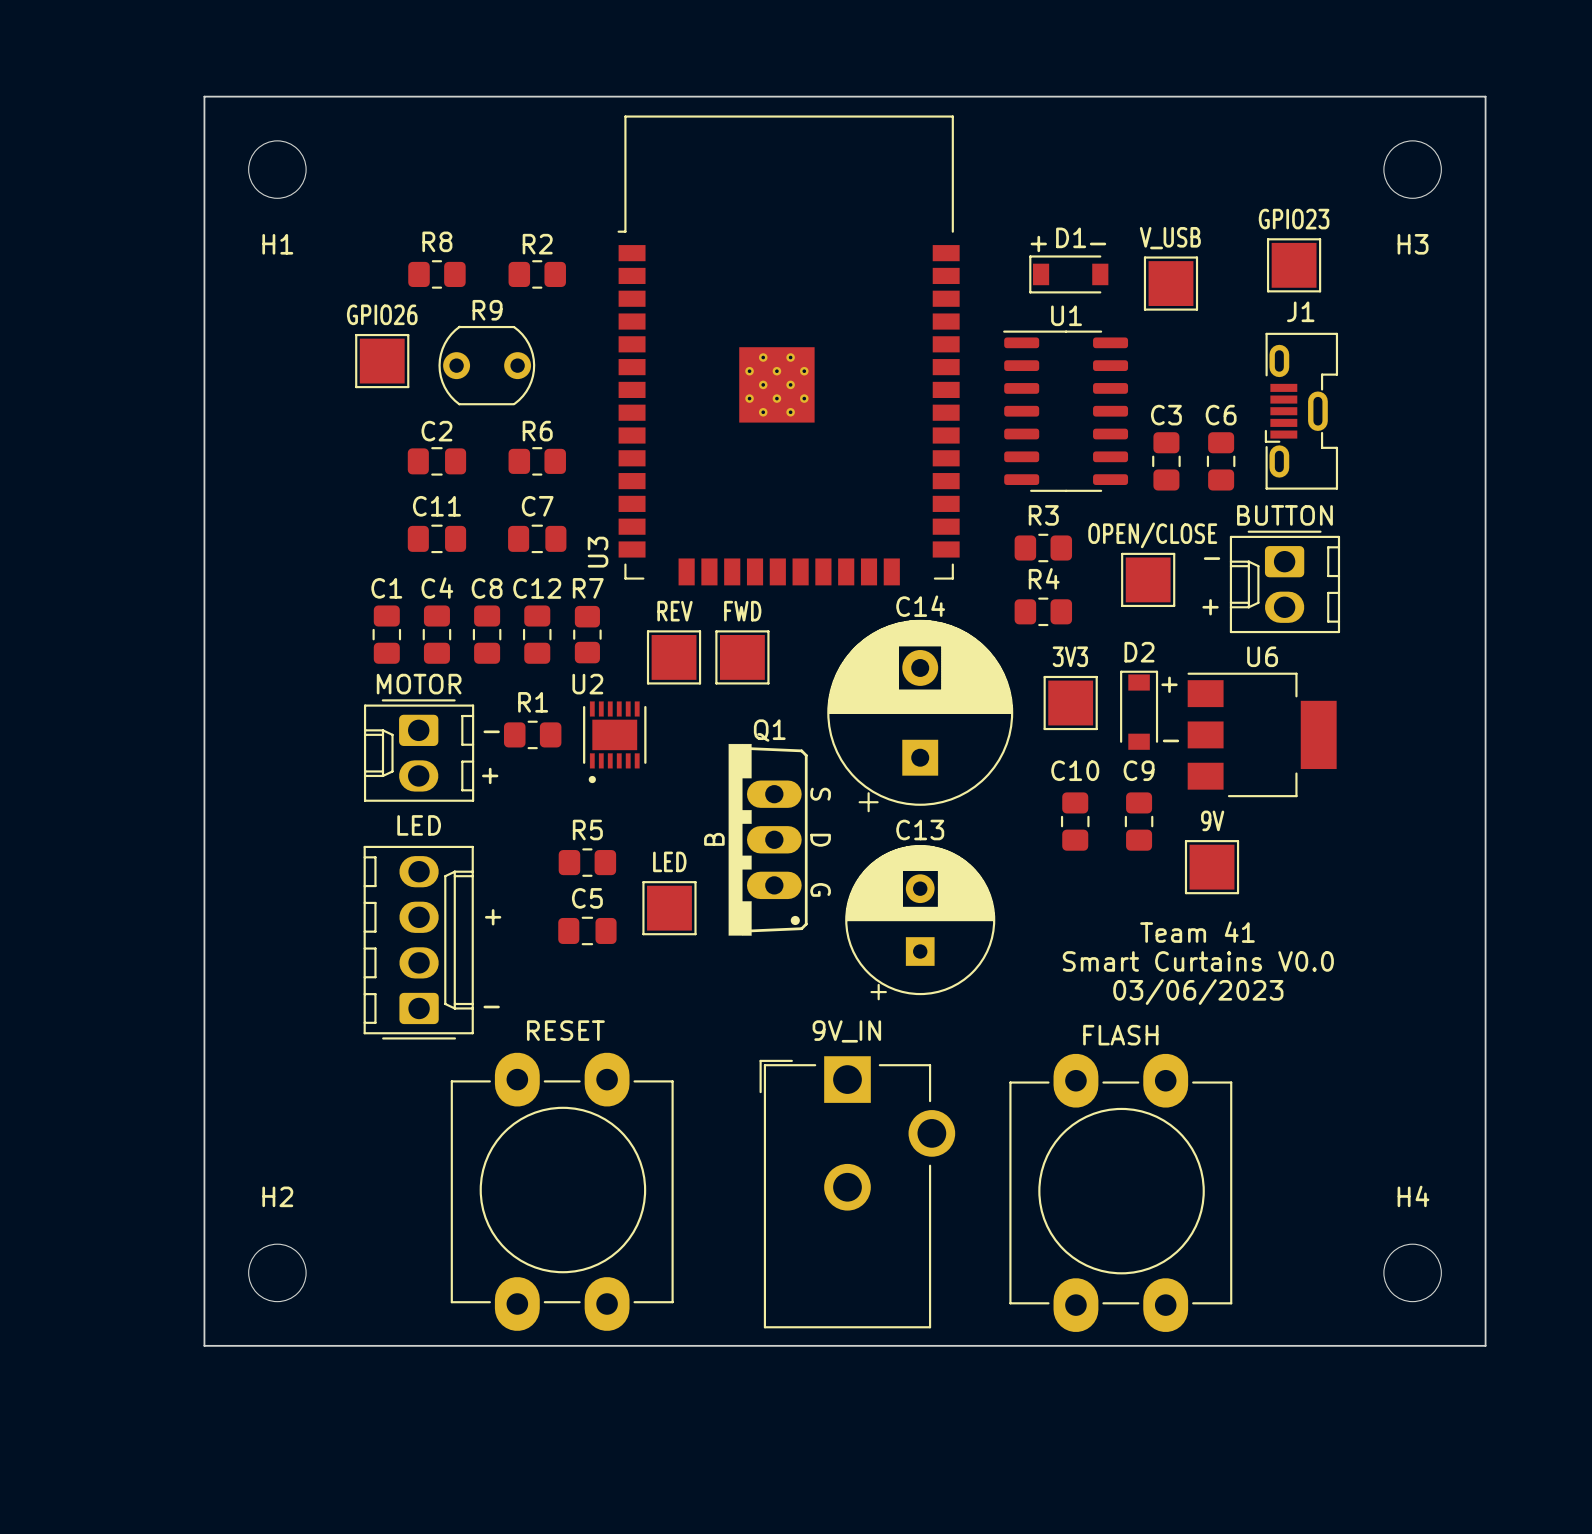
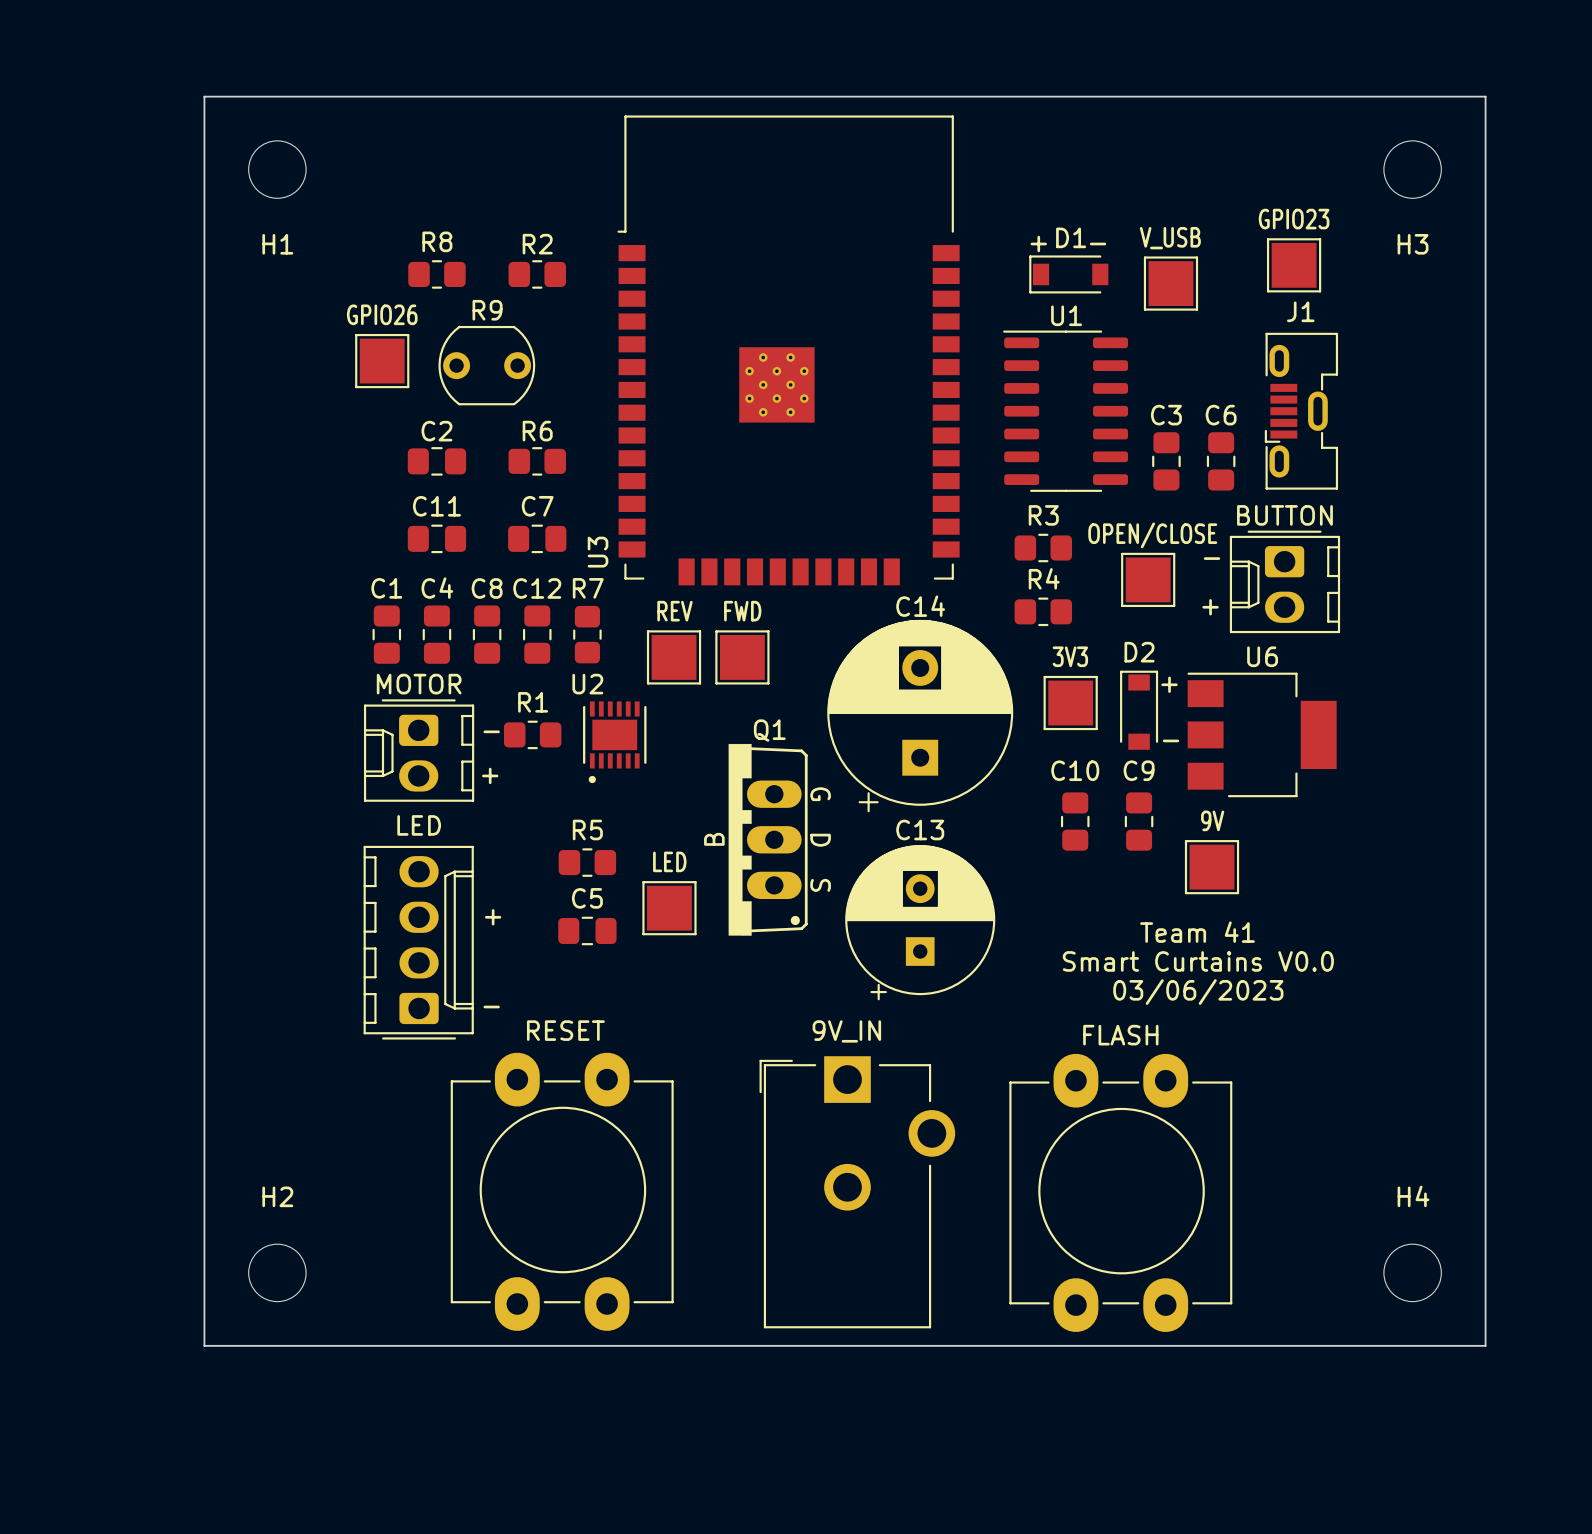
Q1 text: S (820, 794) -> G (820, 794)
Q1 text: none -> S (820, 885)
Q1 text: G (820, 889) -> none

